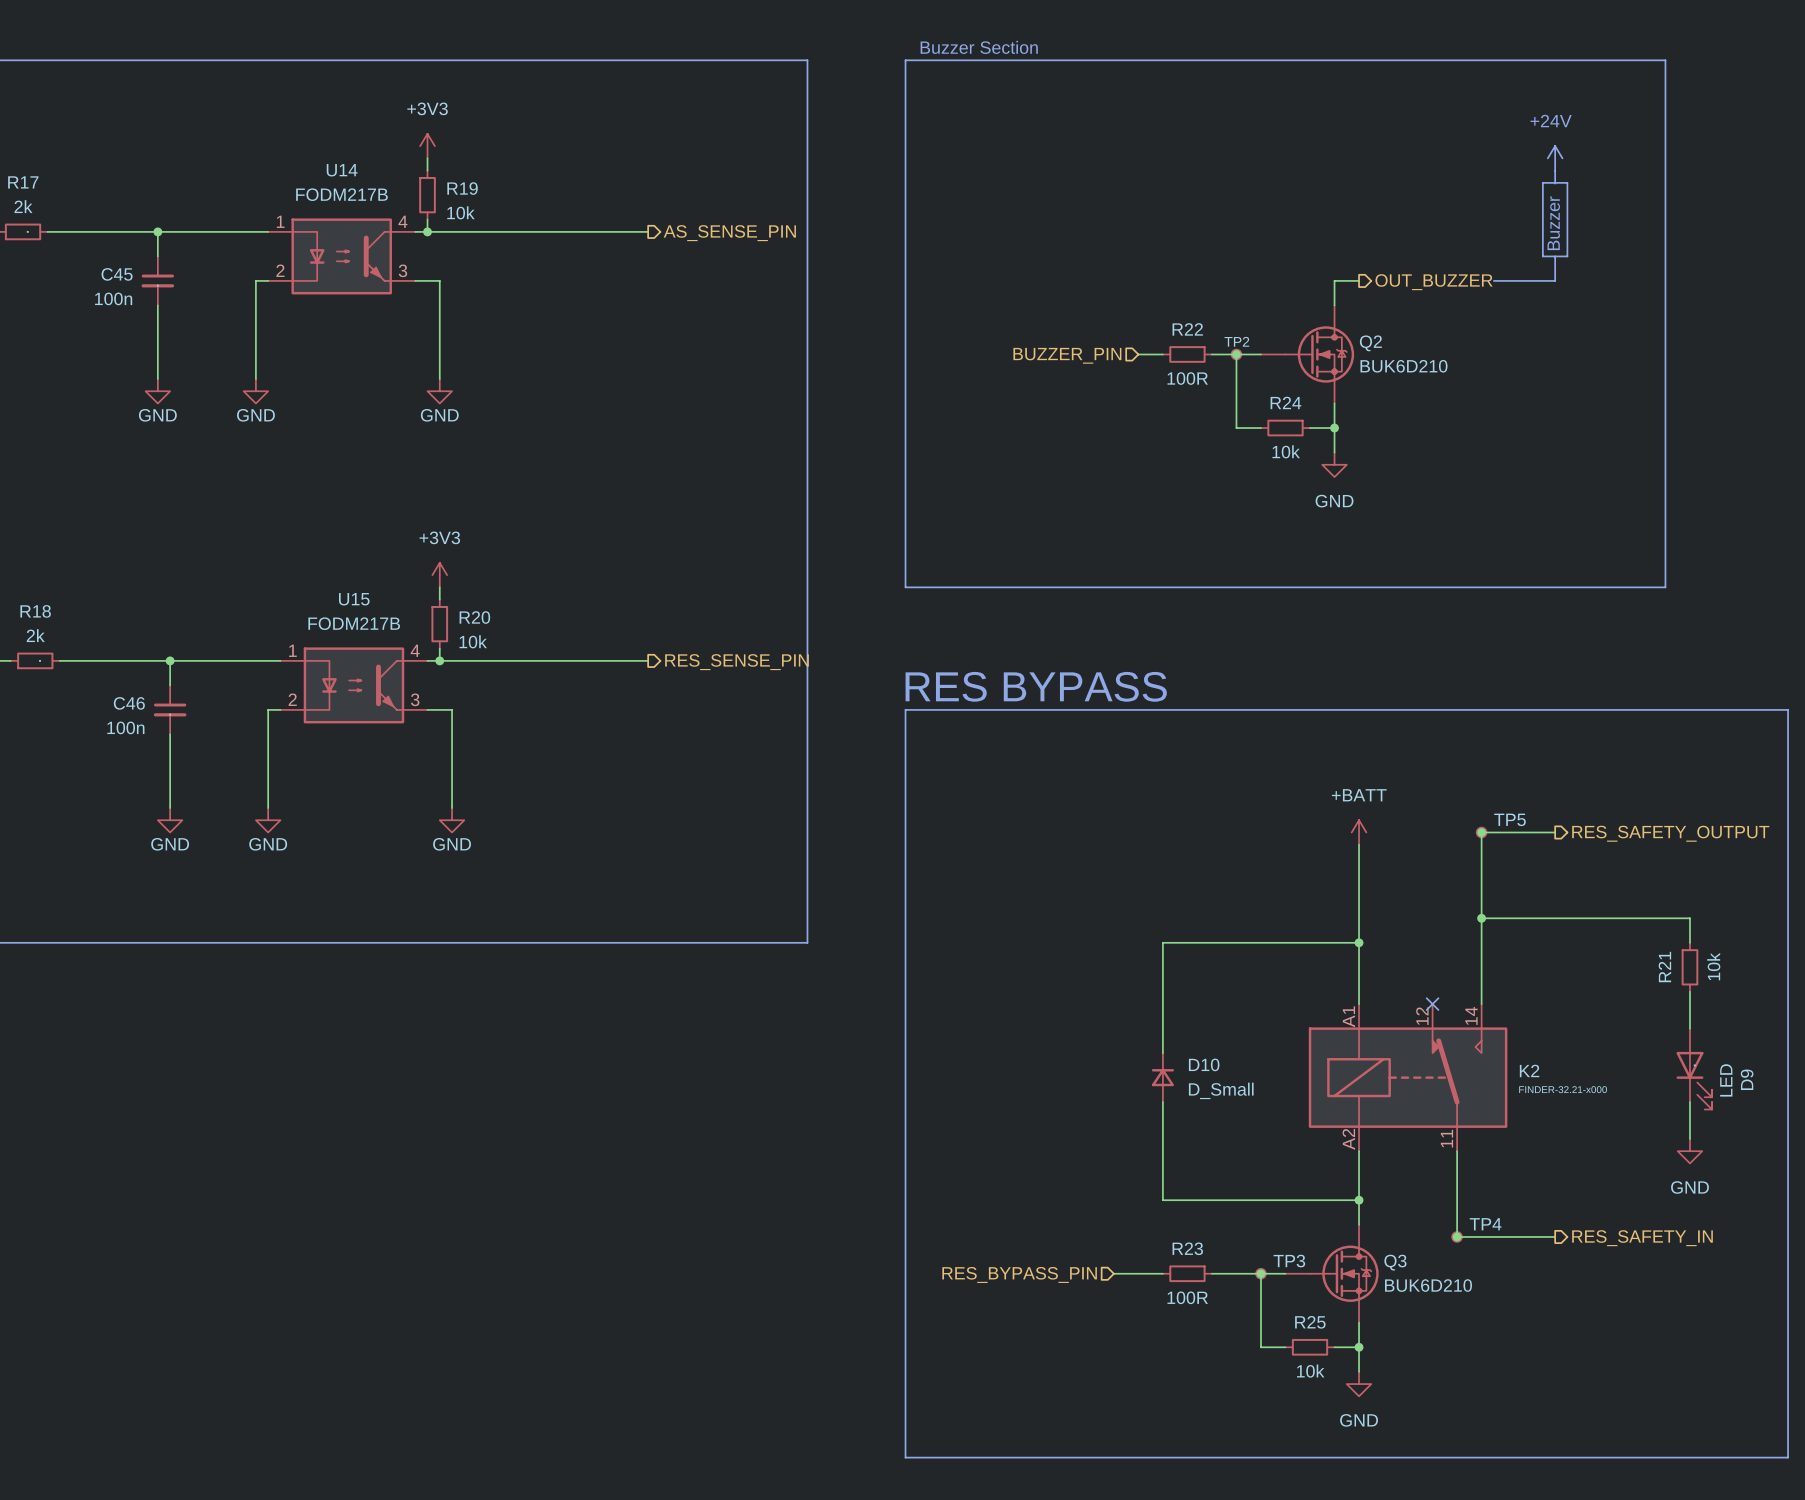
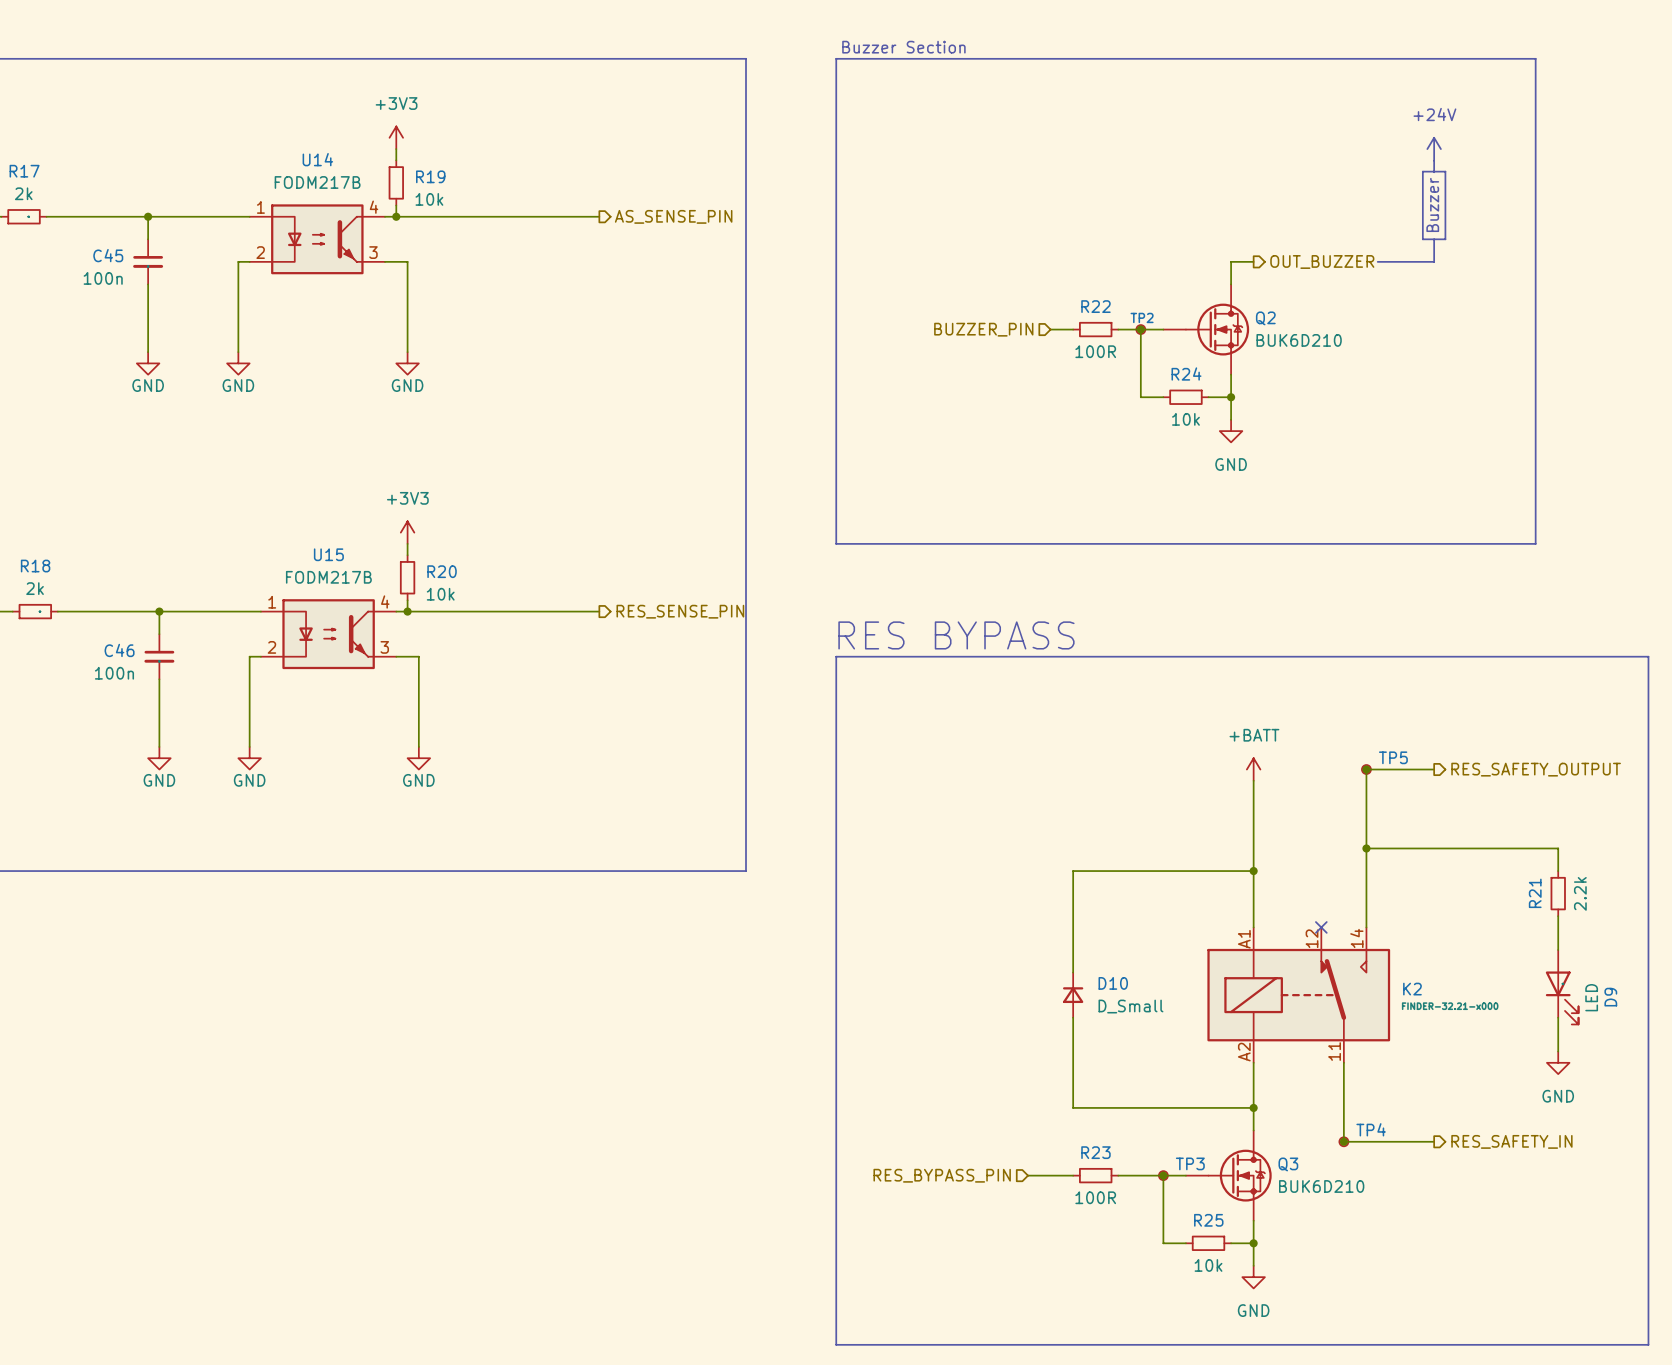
R21 value: 10k (1713, 966) -> 2.2k (1580, 893)

